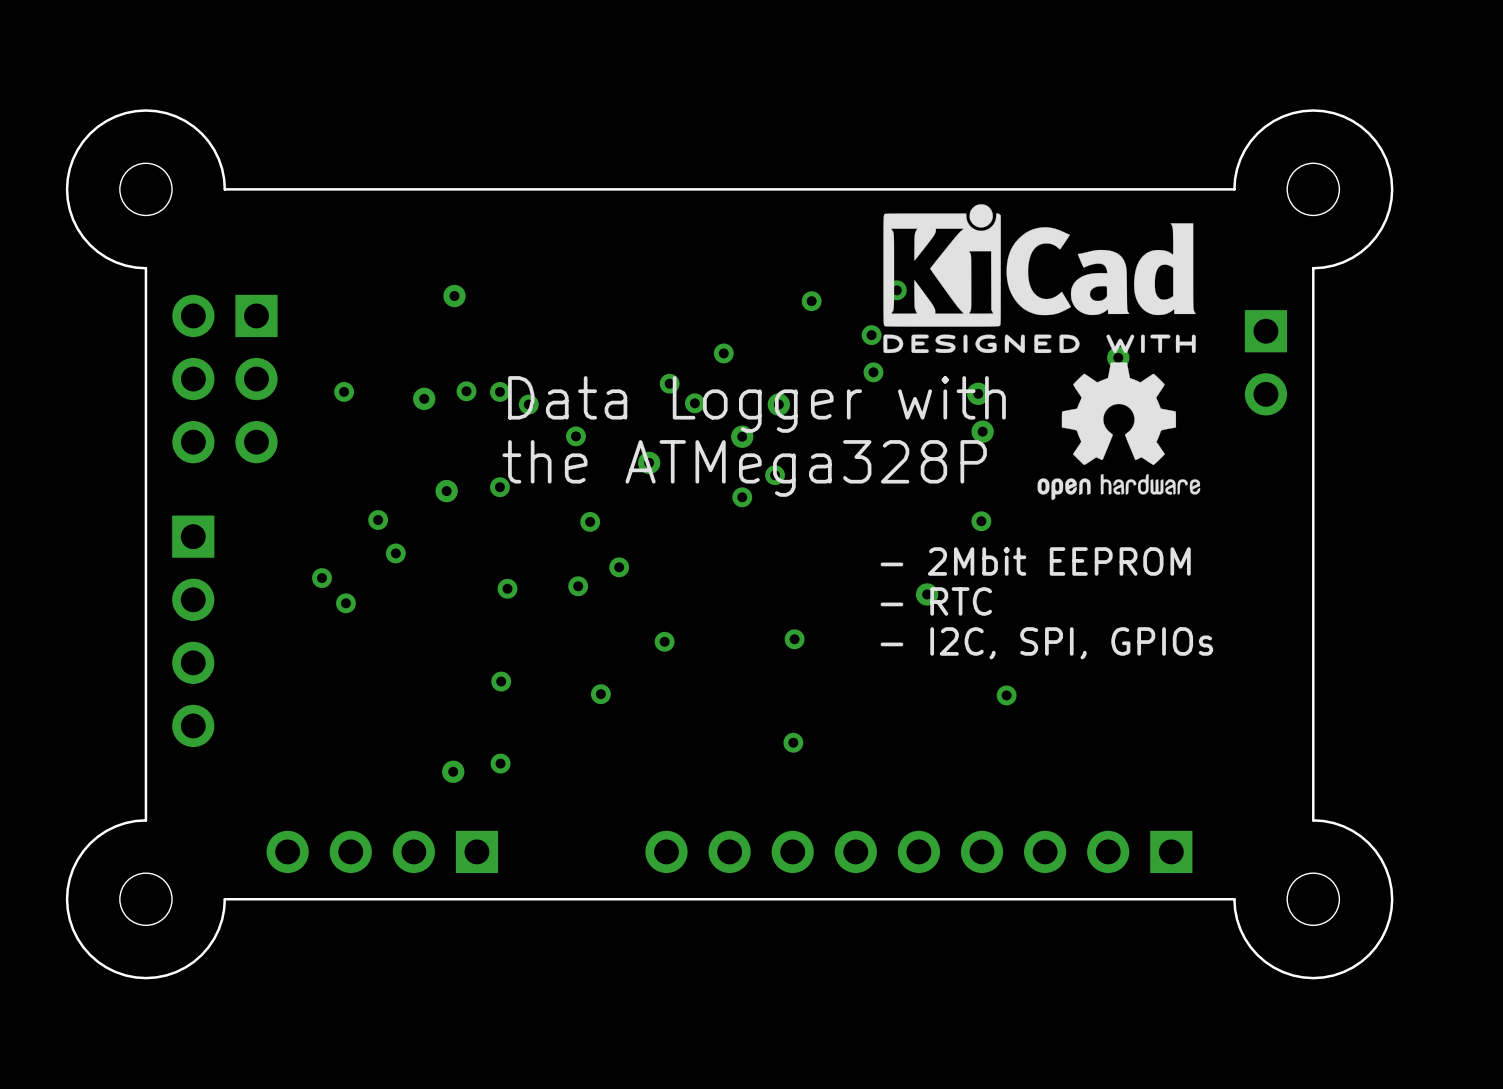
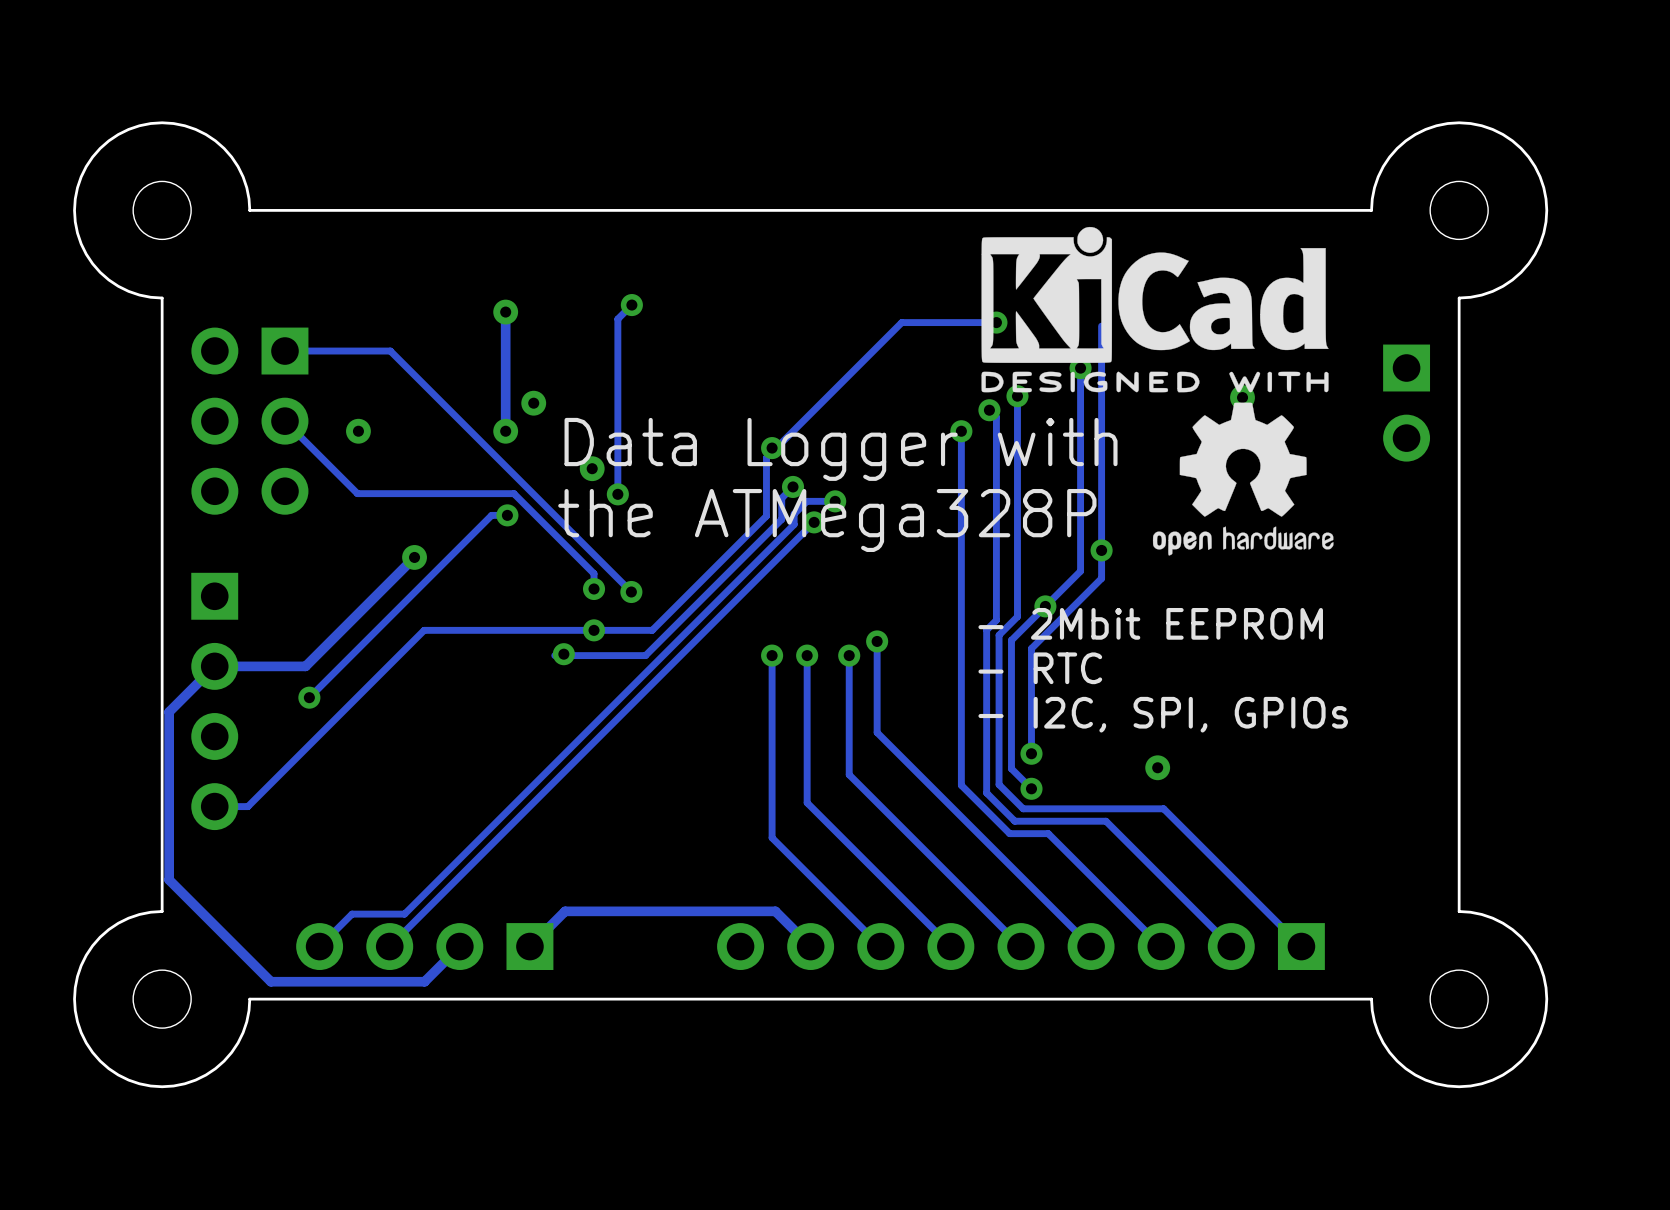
track: none -> (631, 305) (617, 319) (617, 494)
via: none -> (631, 305)
track: none -> (505, 312) (505, 431)
track: none -> (988, 322) (901, 322) (766, 457) (766, 516) (652, 630) (424, 630) (247, 806) (214, 806)
track: none -> (1101, 326) (1101, 578) (1031, 648) (1031, 753)
via position: (454, 296) -> (505, 312)
via: (811, 301) -> none
track: none -> (284, 351) (390, 351) (631, 592)
track: none -> (1080, 368) (1080, 571) (1011, 640) (1011, 768) (1031, 788)
via: none -> (1080, 368)
via: (871, 335) -> none
via: (723, 353) -> none
track: none -> (1017, 396) (1017, 616) (999, 635) (999, 784) (1023, 808) (1163, 808) (1301, 946)
via: none -> (1017, 396)
via: none -> (533, 403)
track: none -> (989, 410) (996, 417) (996, 620) (986, 630) (986, 793) (1014, 821) (1105, 821) (1231, 946)
via: none -> (989, 410)
via: (873, 372) -> none
track: none -> (284, 421) (357, 493) (513, 493) (594, 573) (594, 588)
via: (669, 383) -> none
via: none -> (358, 431)
track: none -> (961, 431) (961, 785) (1009, 833) (1048, 833) (1161, 946)
via: none -> (961, 431)
via: (344, 391) -> none
via: (466, 391) -> none
via: (499, 391) -> none
via: (978, 393) -> none
via position: (424, 398) -> (505, 431)
via position: (528, 404) -> (592, 468)
via: (778, 404) -> none
via: (982, 431) -> none
via position: (575, 436) -> (617, 494)
via position: (742, 436) -> (835, 501)
track: none -> (793, 486) (781, 498) (781, 519) (645, 655) (554, 655)
via: none -> (793, 486)
track: none -> (835, 501) (806, 501) (794, 514) (794, 524) (404, 914) (352, 914) (319, 946)
via: (649, 462) -> none
track: none -> (507, 515) (491, 515) (309, 697)
via: none -> (507, 515)
track: none -> (813, 522) (389, 946)
via: none -> (814, 522)
via: (775, 475) -> none
via: (499, 487) -> none
via: (446, 491) -> none
via: none -> (1101, 550)
via: (742, 497) -> none
track: none -> (414, 557) (305, 666) (214, 666) (169, 711) (169, 879) (270, 981) (424, 981) (459, 946)
via position: (378, 520) -> (414, 557)
via position: (590, 521) -> (631, 592)
via: (981, 521) -> none
via: none -> (594, 588)
via: none -> (1045, 606)
via: (395, 553) -> none
via: none -> (594, 630)
via: (619, 567) -> none
track: none -> (877, 641) (877, 732) (1091, 946)
via: none -> (877, 641)
via: (321, 578) -> none
via: (578, 586) -> none
track: none -> (772, 655) (772, 837) (880, 946)
via: none -> (772, 655)
track: none -> (807, 655) (807, 802) (950, 946)
via: none -> (807, 655)
track: none -> (849, 655) (849, 774) (1020, 946)
via: none -> (849, 655)
via: (927, 594) -> none
via: (345, 603) -> none
via: none -> (309, 697)
via: (794, 639) -> none
via: (664, 641) -> none
via: none -> (1031, 753)
via: (501, 681) -> none
via: none -> (1157, 767)
via: (600, 694) -> none
via: (1006, 695) -> none
via: none -> (1031, 788)
via: (793, 742) -> none
via: (500, 763) -> none
via: (453, 771) -> none
track: none -> (810, 946) (775, 911) (565, 911) (529, 946)

